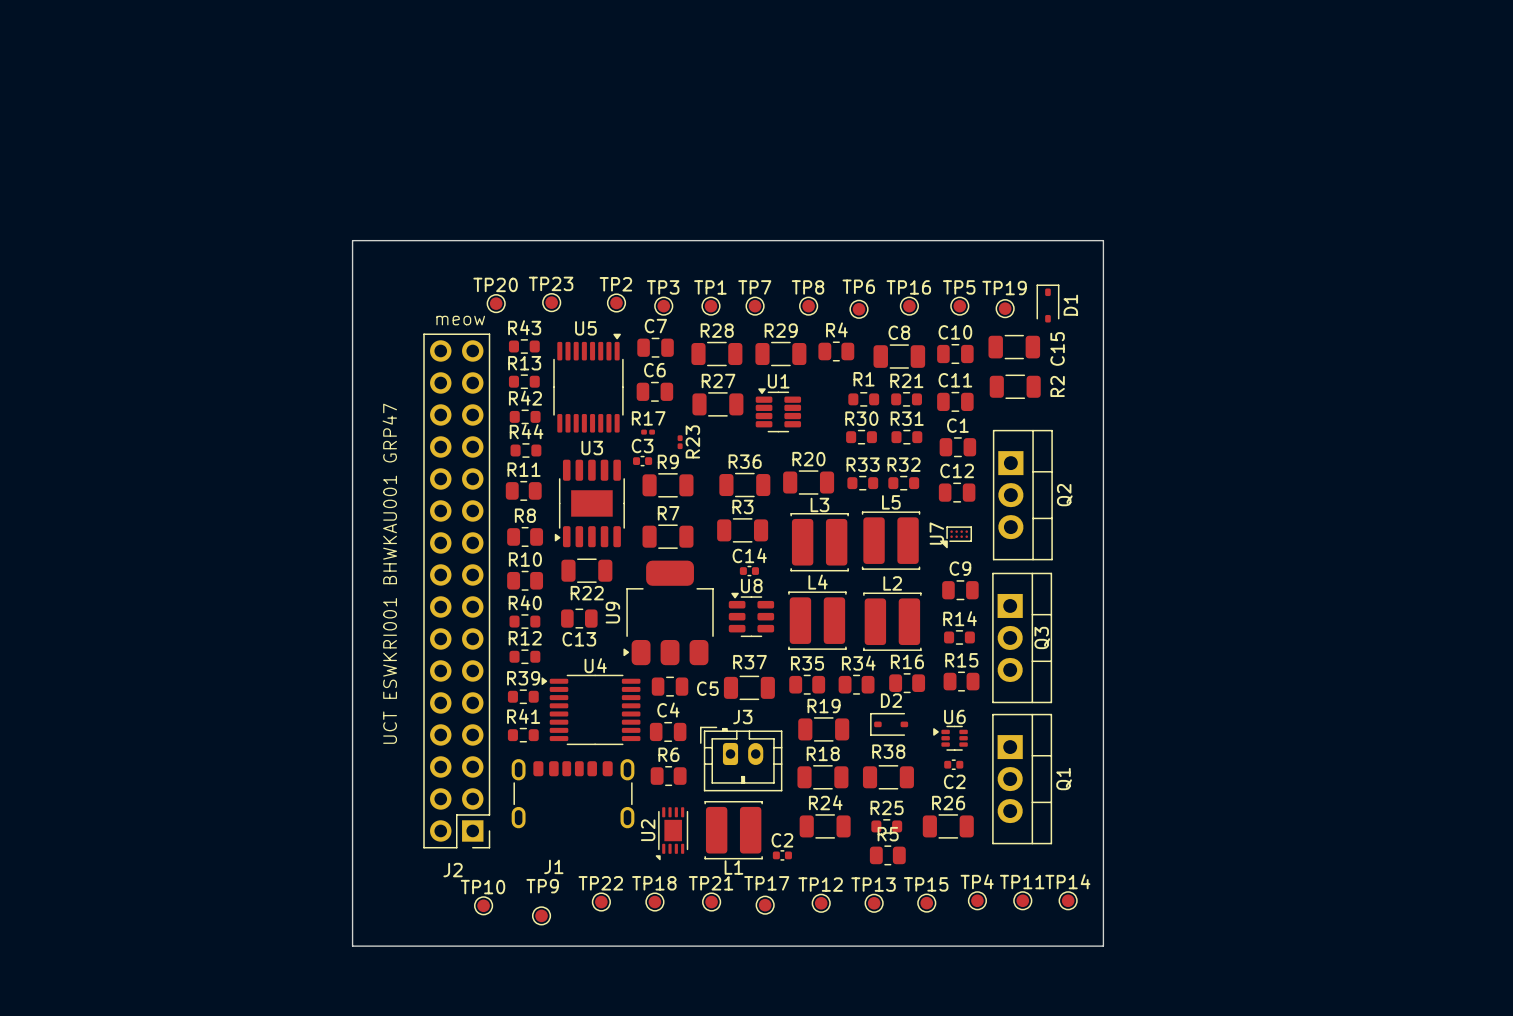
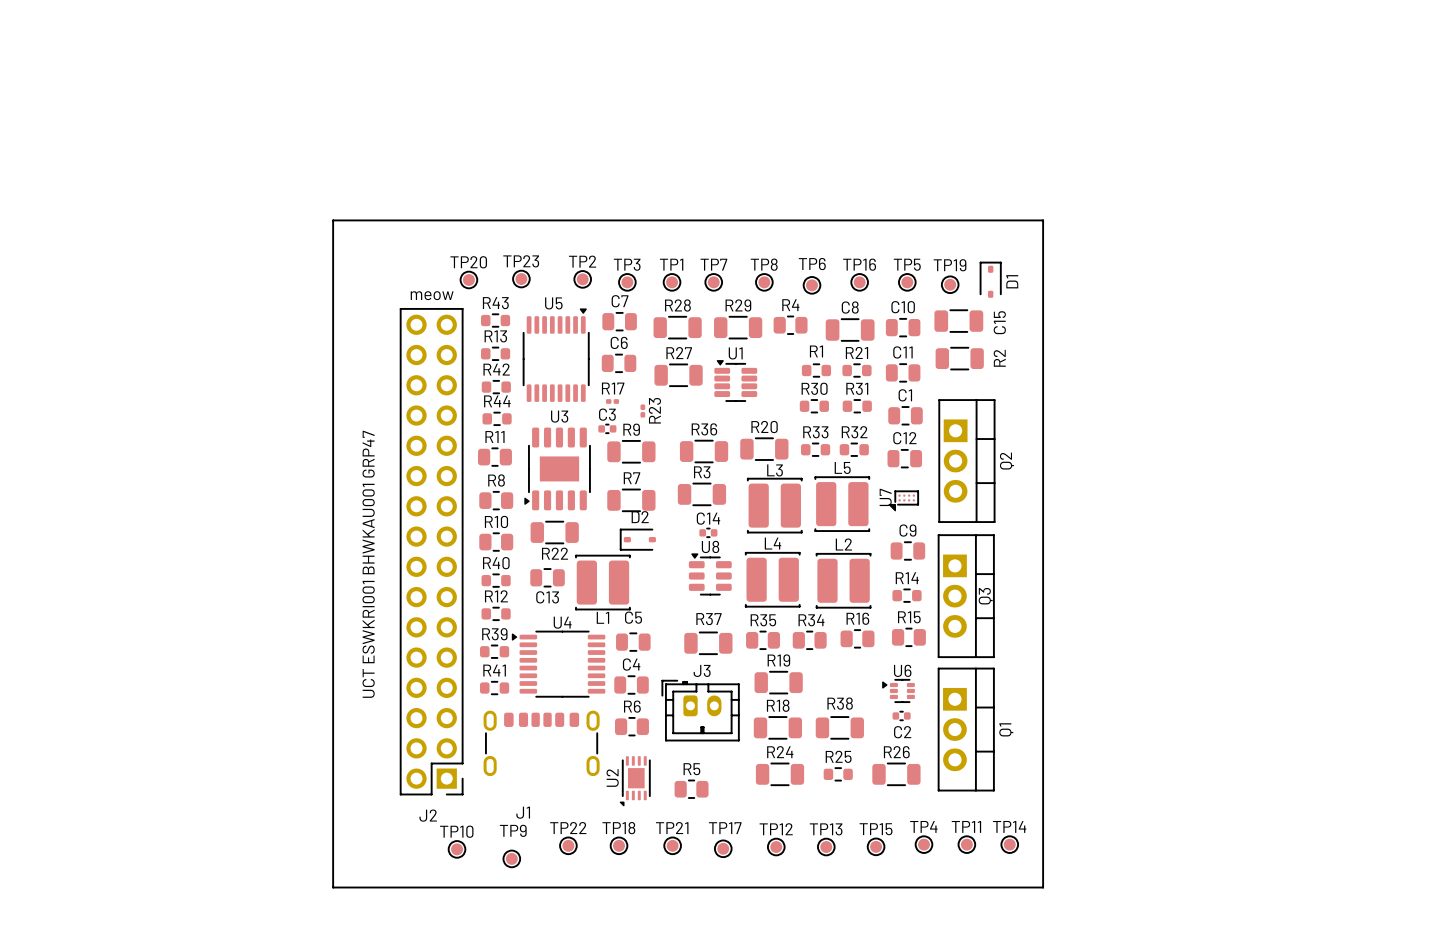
U9: (668, 612) -> none
C5 name position: C5 (707, 688) -> C5 (633, 617)
D2 position: (889, 724) -> (637, 539)
L1 position: (733, 830) -> (602, 582)
C2: (782, 855) -> none
R5 position: (887, 855) -> (691, 789)

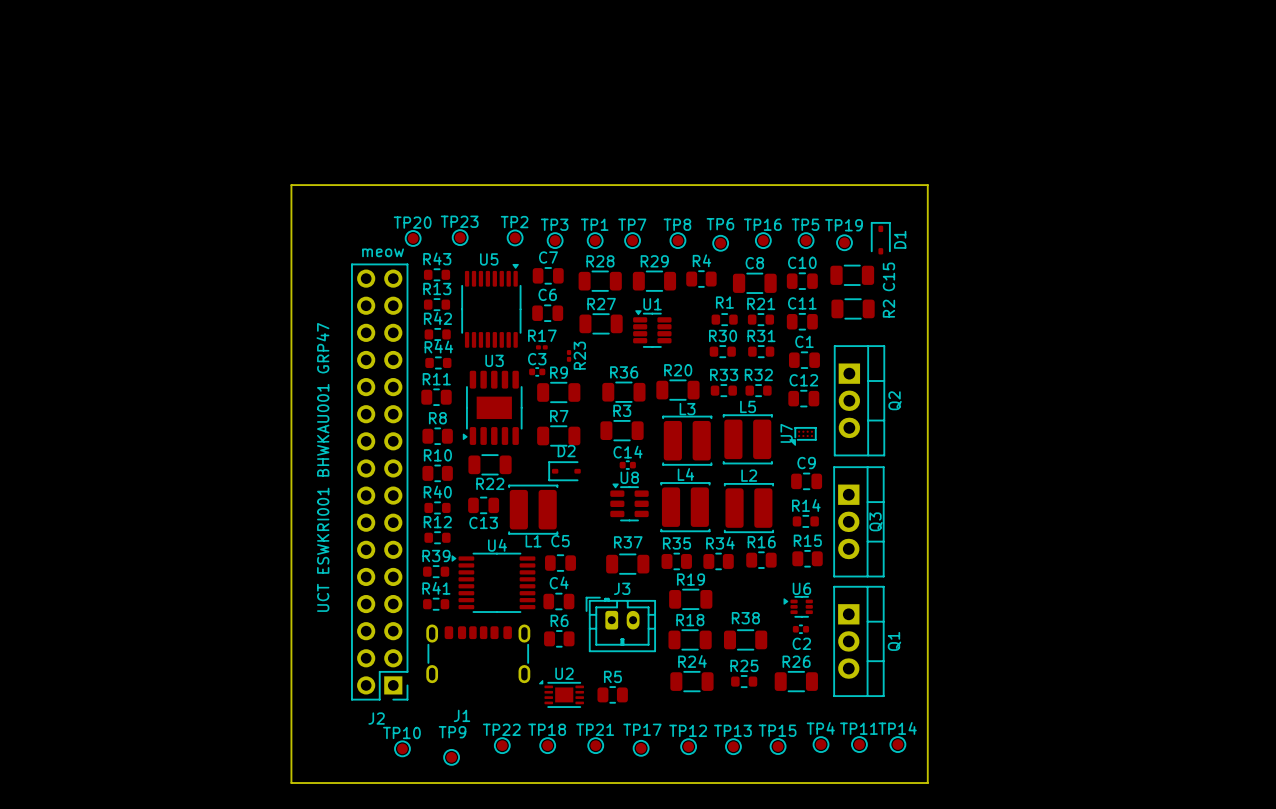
U2 rotation: 0° (635, 781) -> 90° clockwise (561, 693)

